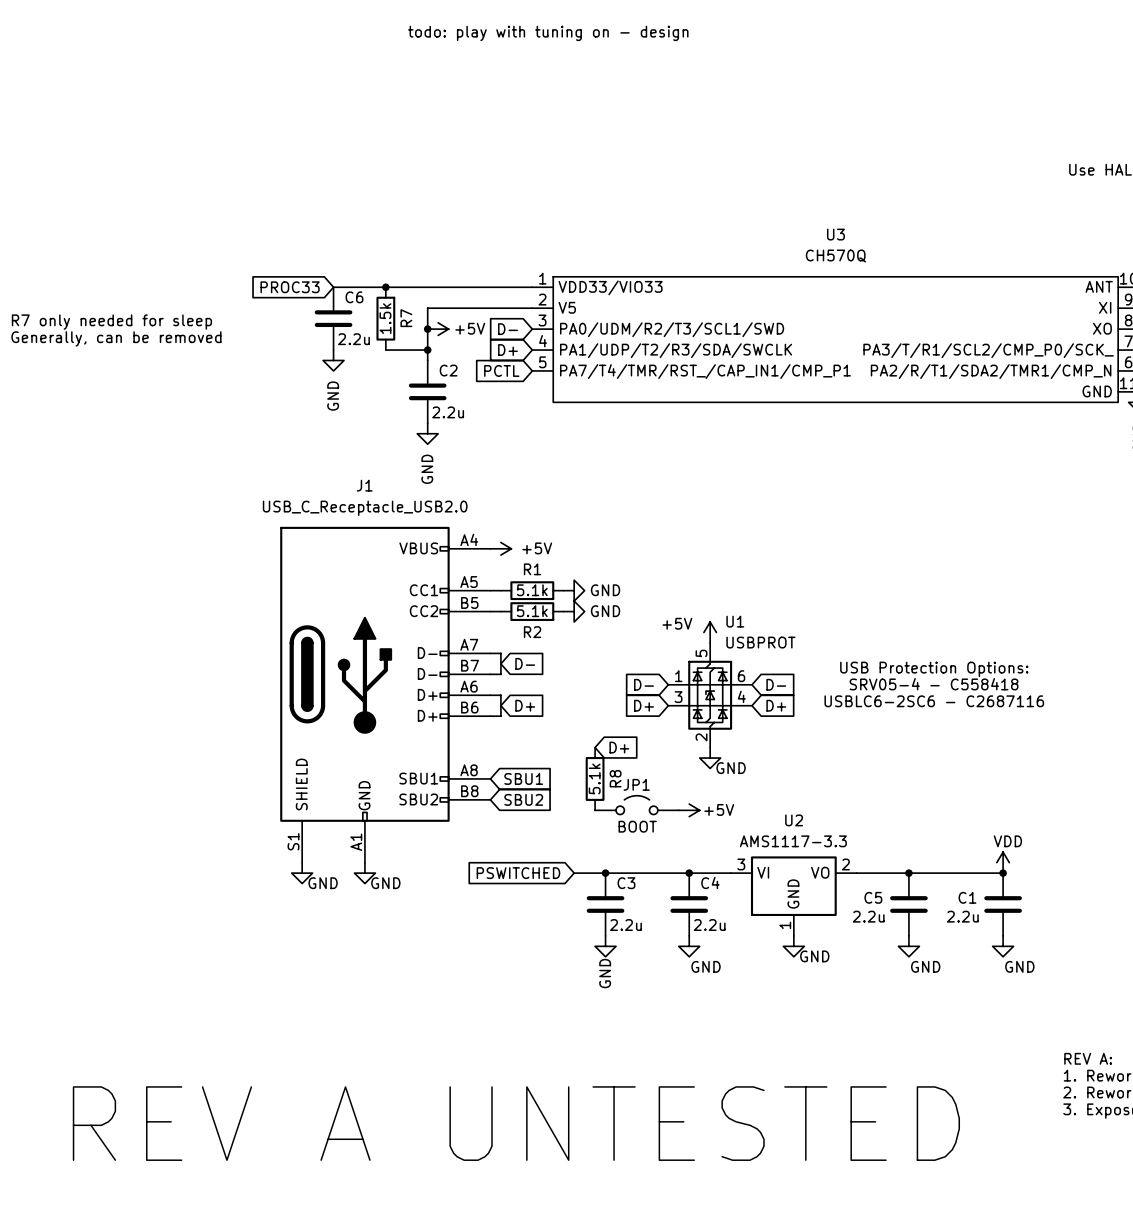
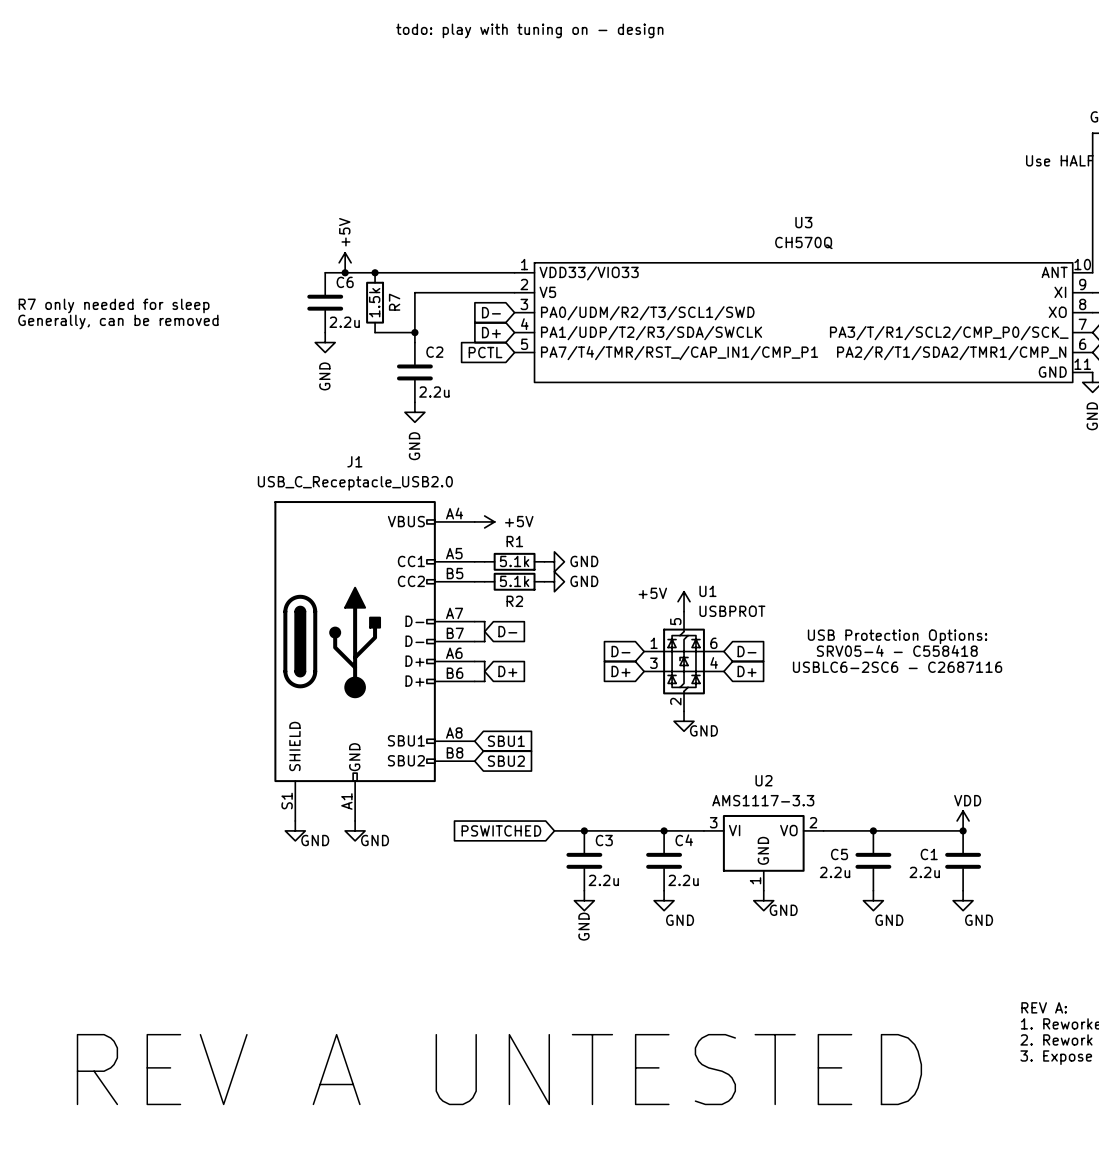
global label: PROC33 (290, 287) -> none
junction: none -> (345, 272)
junction: (427, 329) -> none
power symbol rotation: 0° (438, 329) -> 90° counterclockwise (345, 262)
power symbol position: +5V (438, 329) -> +5V (345, 262)
global label: D+ (619, 747) -> none
R8: 5.1k (595, 778) -> none
JP1: BOOT (636, 805) -> none
power symbol: +5V (689, 810) -> none

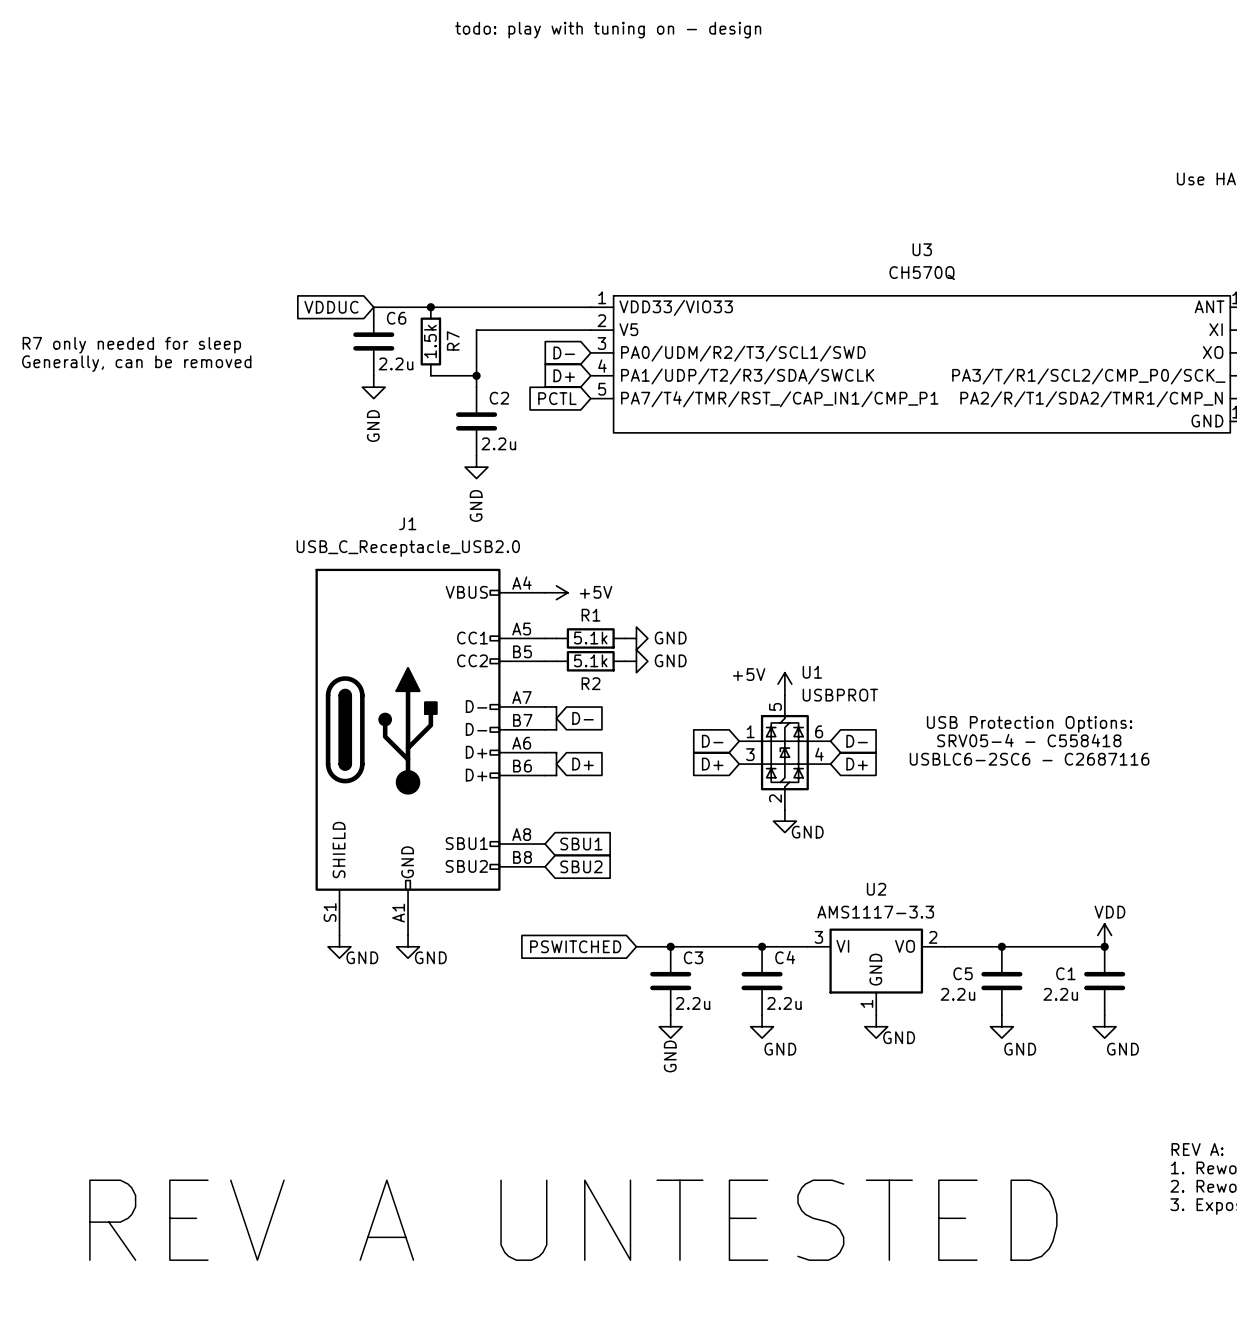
power symbol: +5V (345, 262) -> none
global label: none -> VDDUC (331, 307)
junction: (345, 272) -> none

